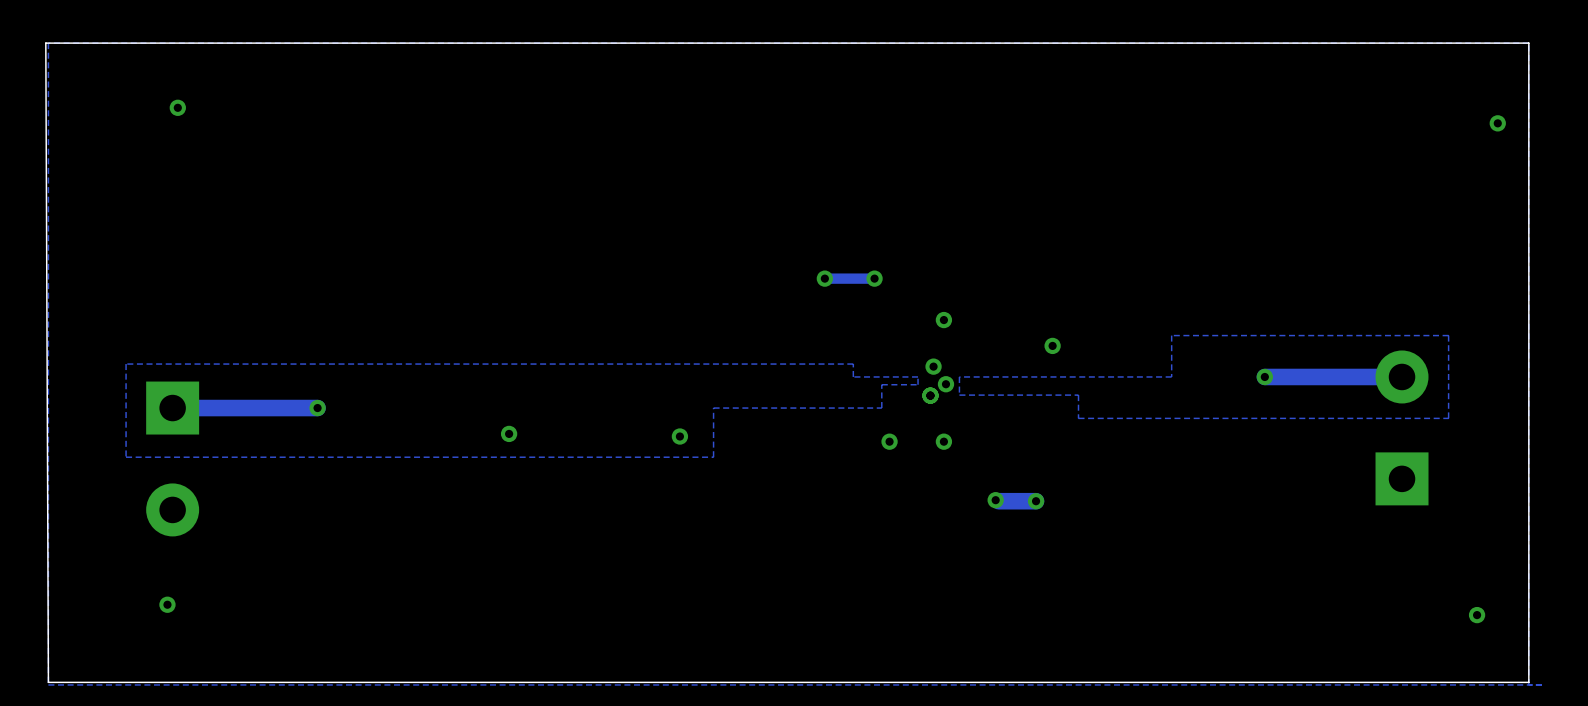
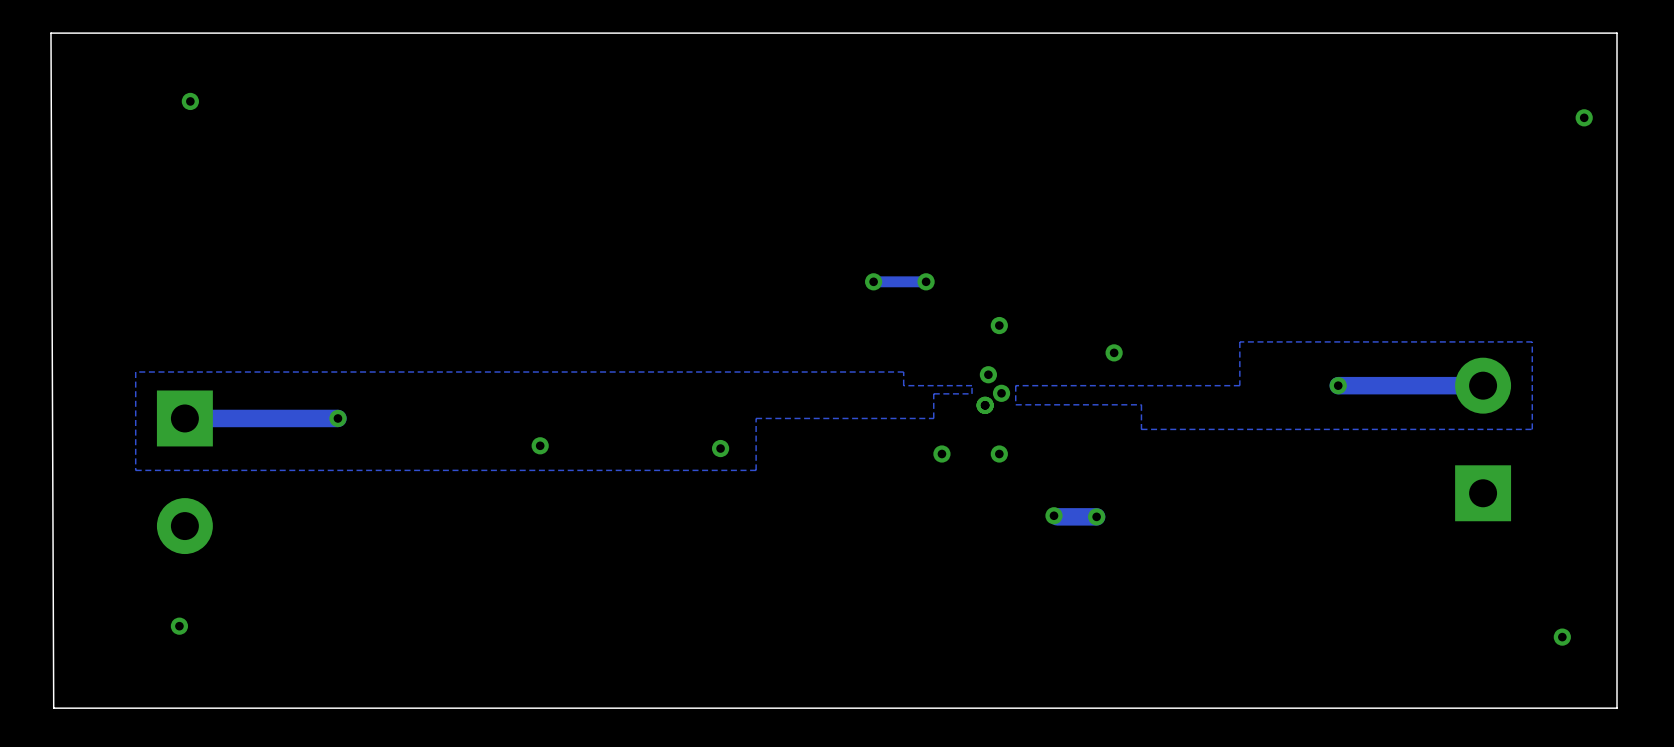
zone outline: (1541, 684) (48, 684) (48, 43) (1528, 43) (1528, 684) -> none

